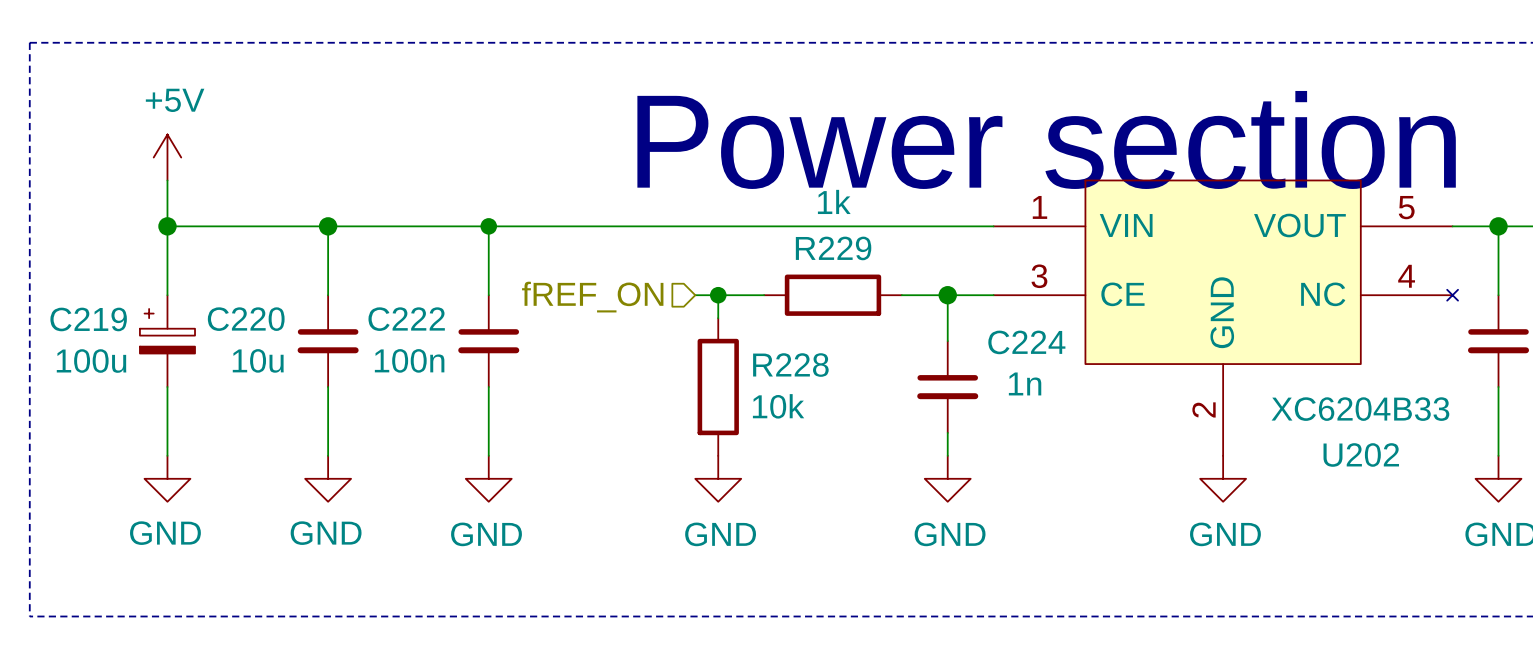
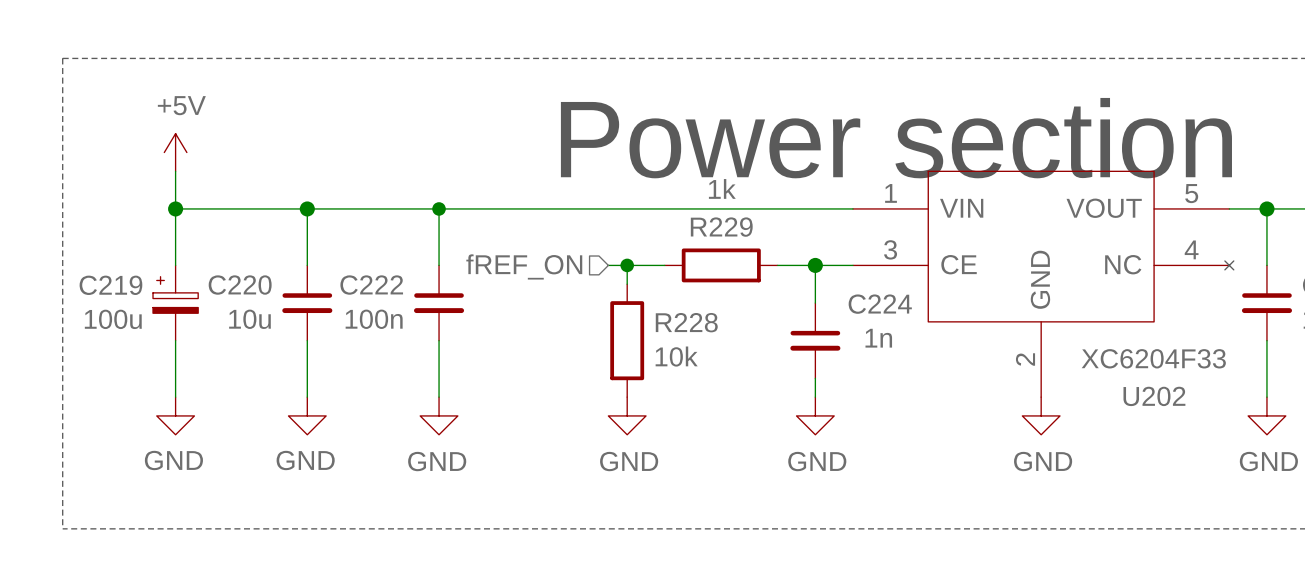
U202 value: XC6204B33 (1360, 409) -> XC6204F33 (1153, 358)

